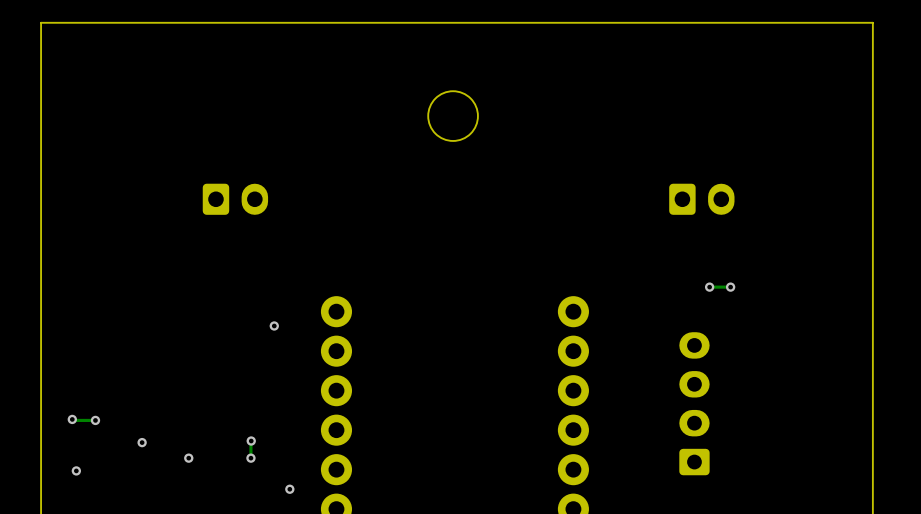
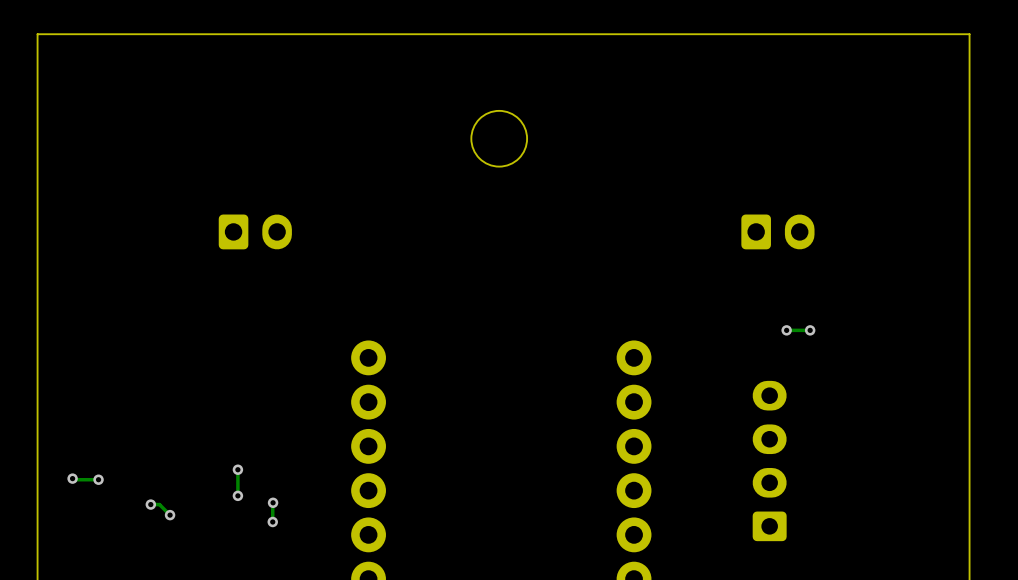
via: (274, 325) -> none
track: none -> (237, 469) (237, 495)
via: none -> (237, 469)
via: none -> (237, 495)
track: none -> (153, 502) (159, 504) (170, 515)
via: none -> (170, 515)
via: (188, 458) -> none
via: (76, 470) -> none
via: (289, 489) -> none

